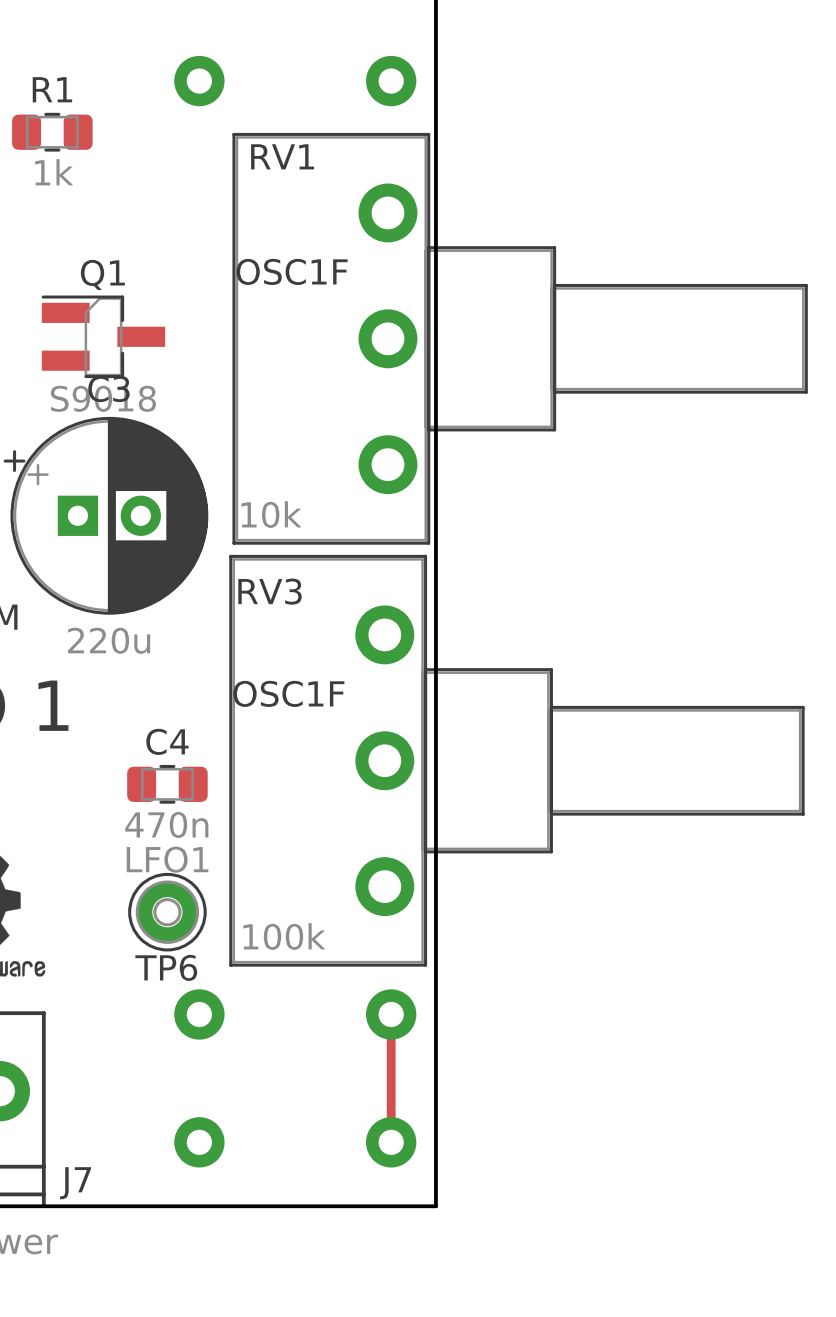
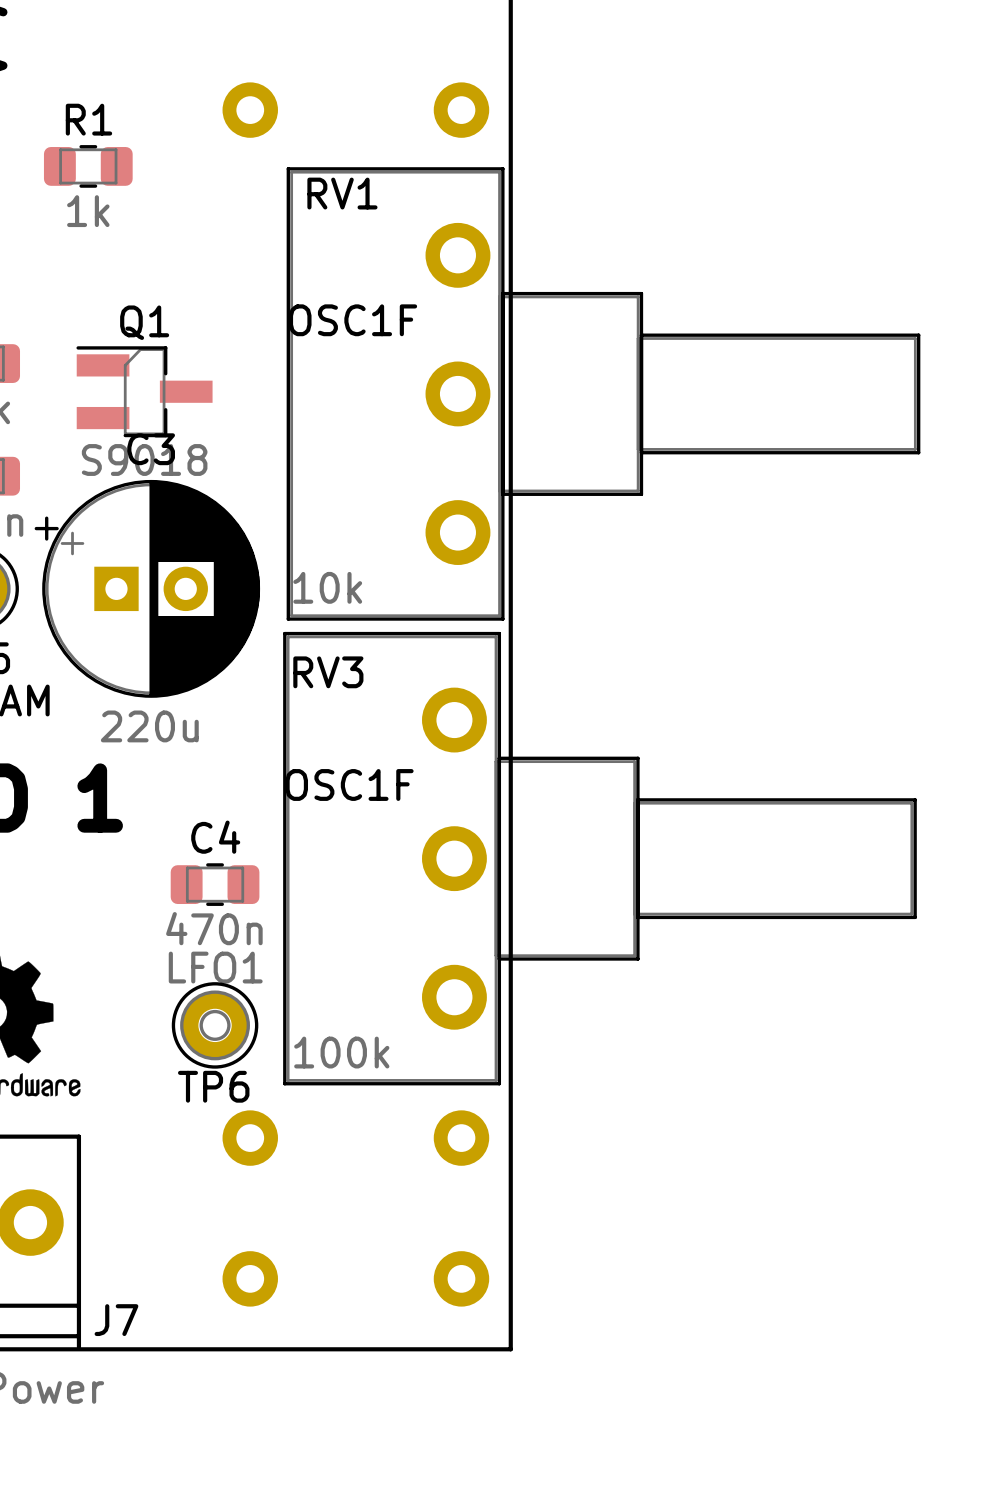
top track: (391, 1014) (391, 1142) -> none

